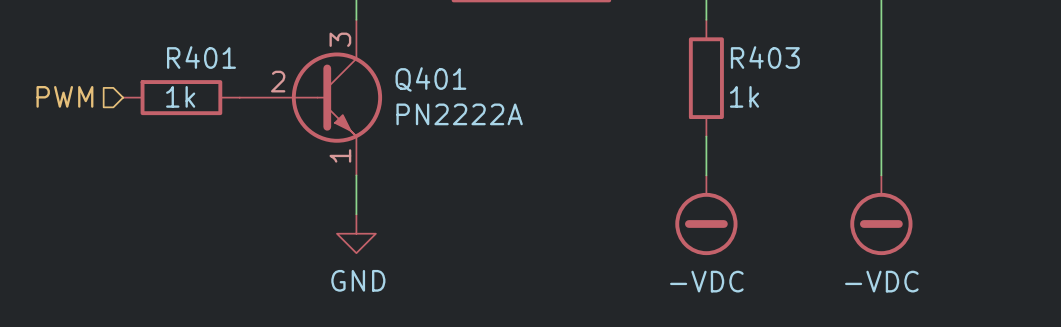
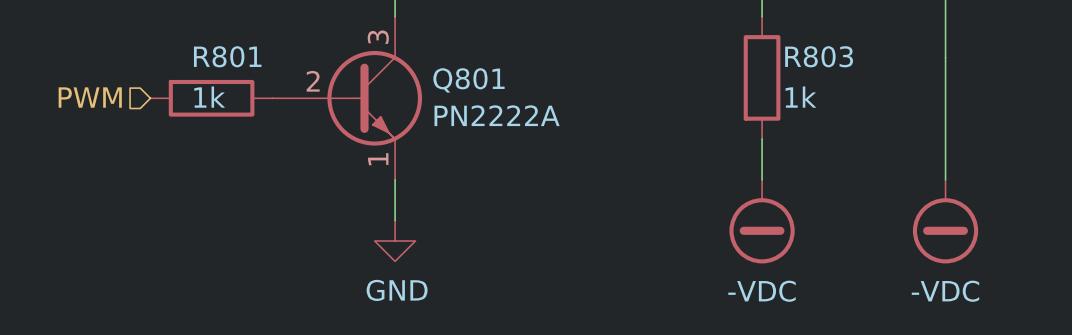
R401 name: R401 (201, 57) -> R801 (227, 56)
R403 name: R403 (765, 57) -> R803 (819, 56)
Q401 name: Q401 (430, 79) -> Q801 (468, 80)

